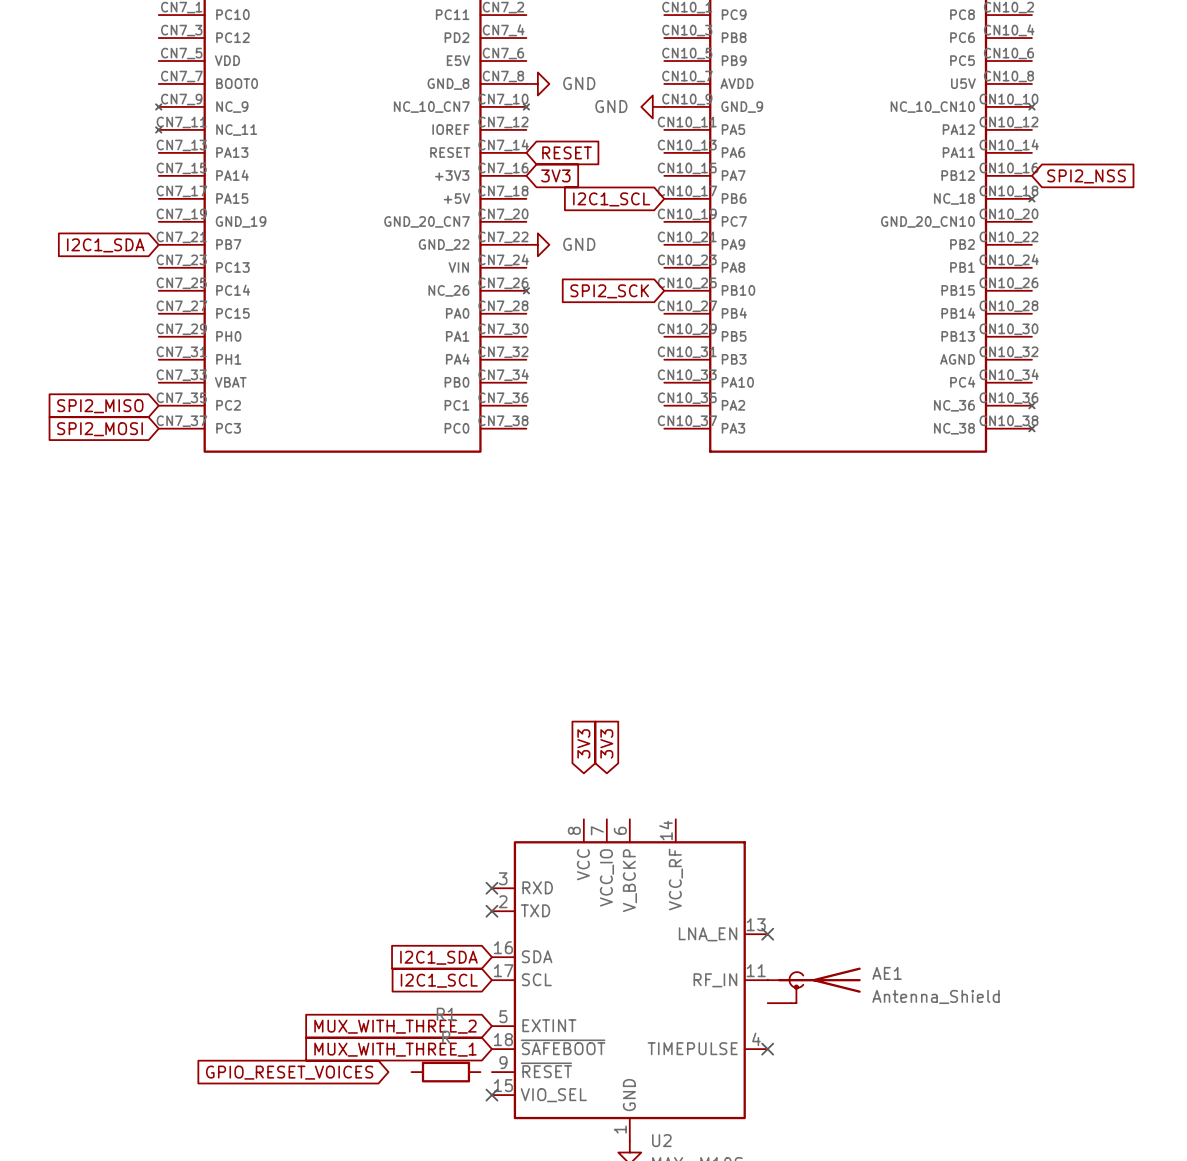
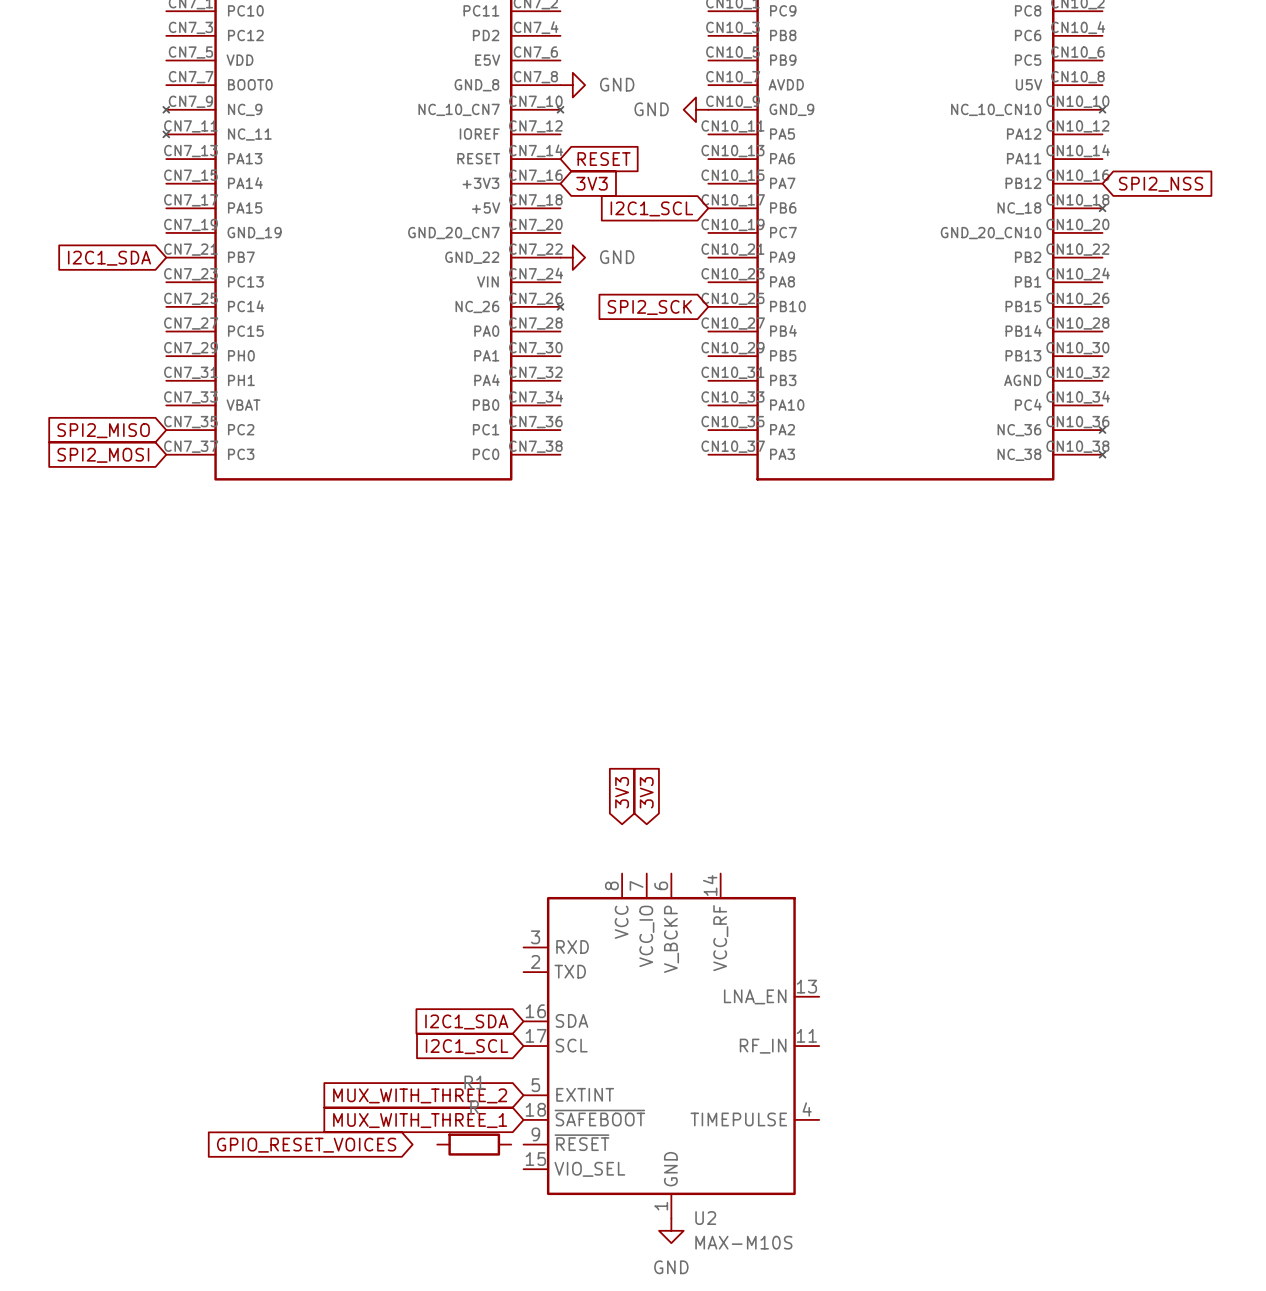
no-connect mark: (491, 888) -> none
no-connect mark: (491, 911) -> none
no-connect mark: (767, 934) -> none
AE1: Antenna_Shield (814, 985) -> none
no-connect mark: (767, 1049) -> none
no-connect mark: (491, 1095) -> none

